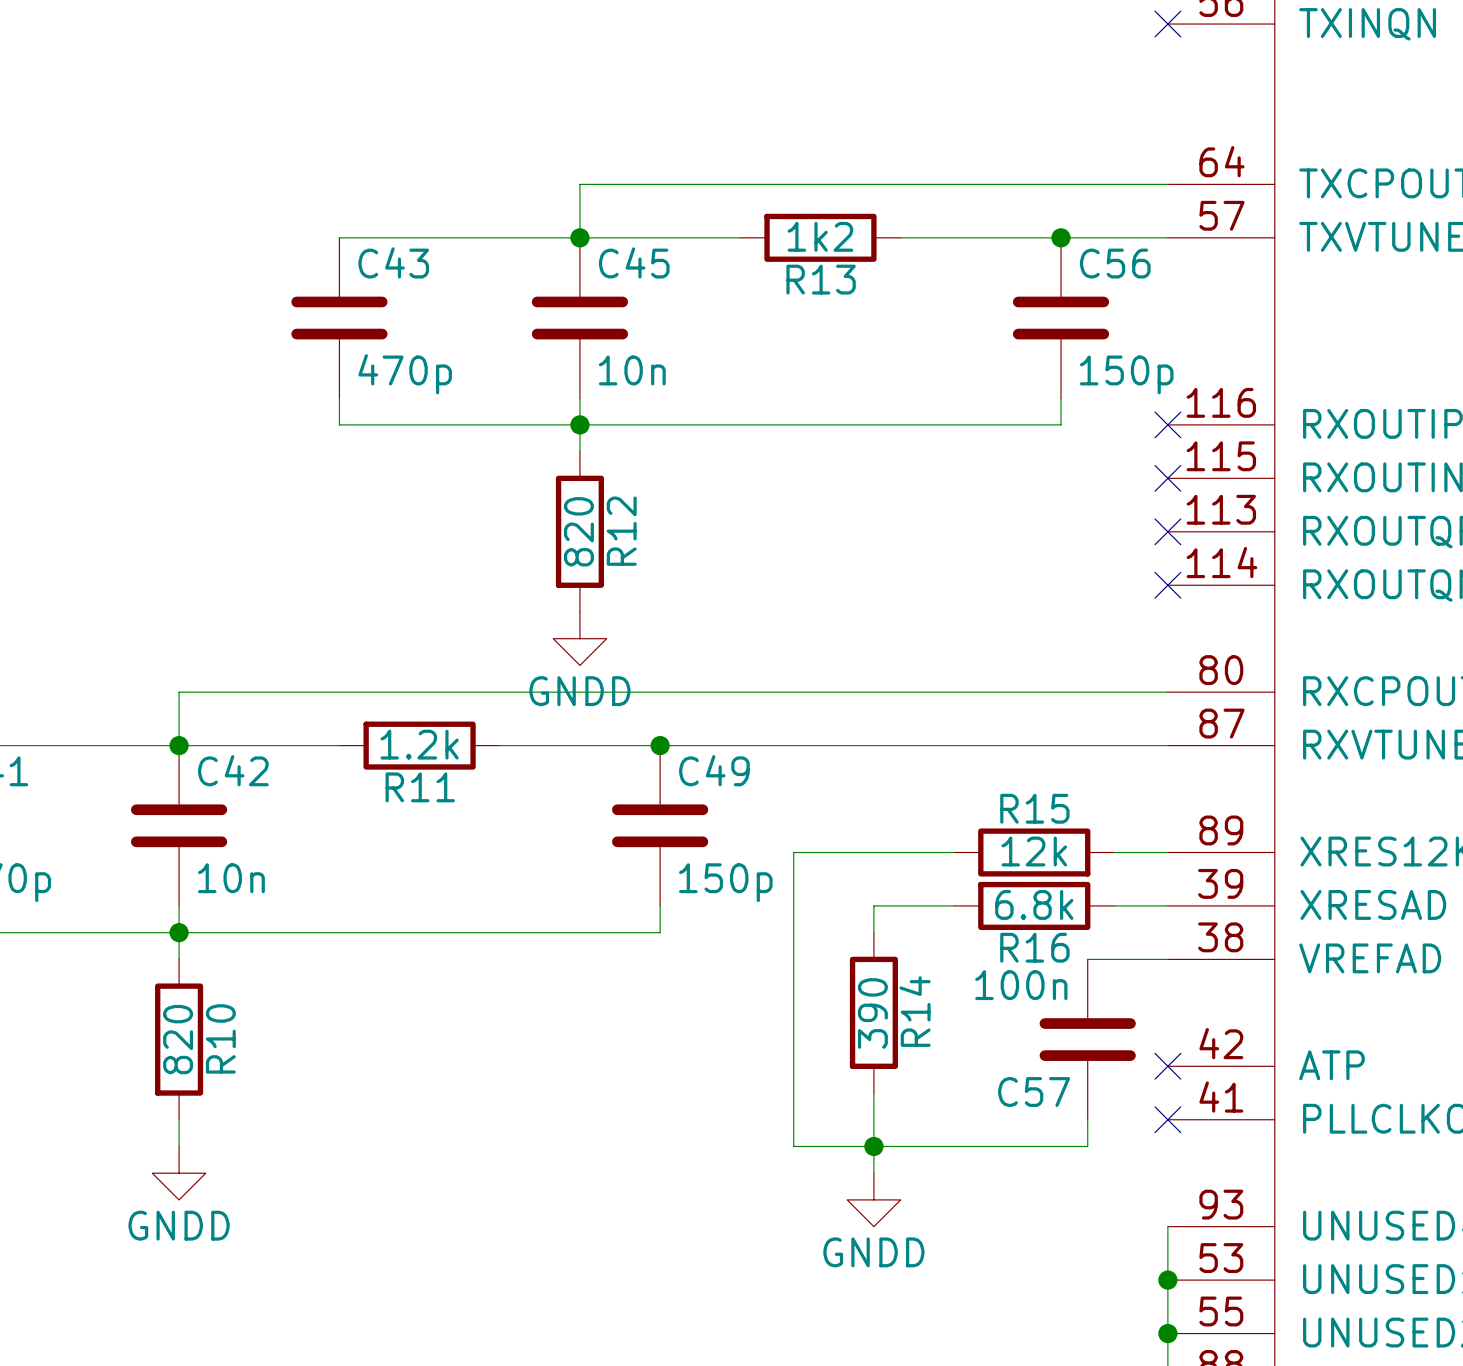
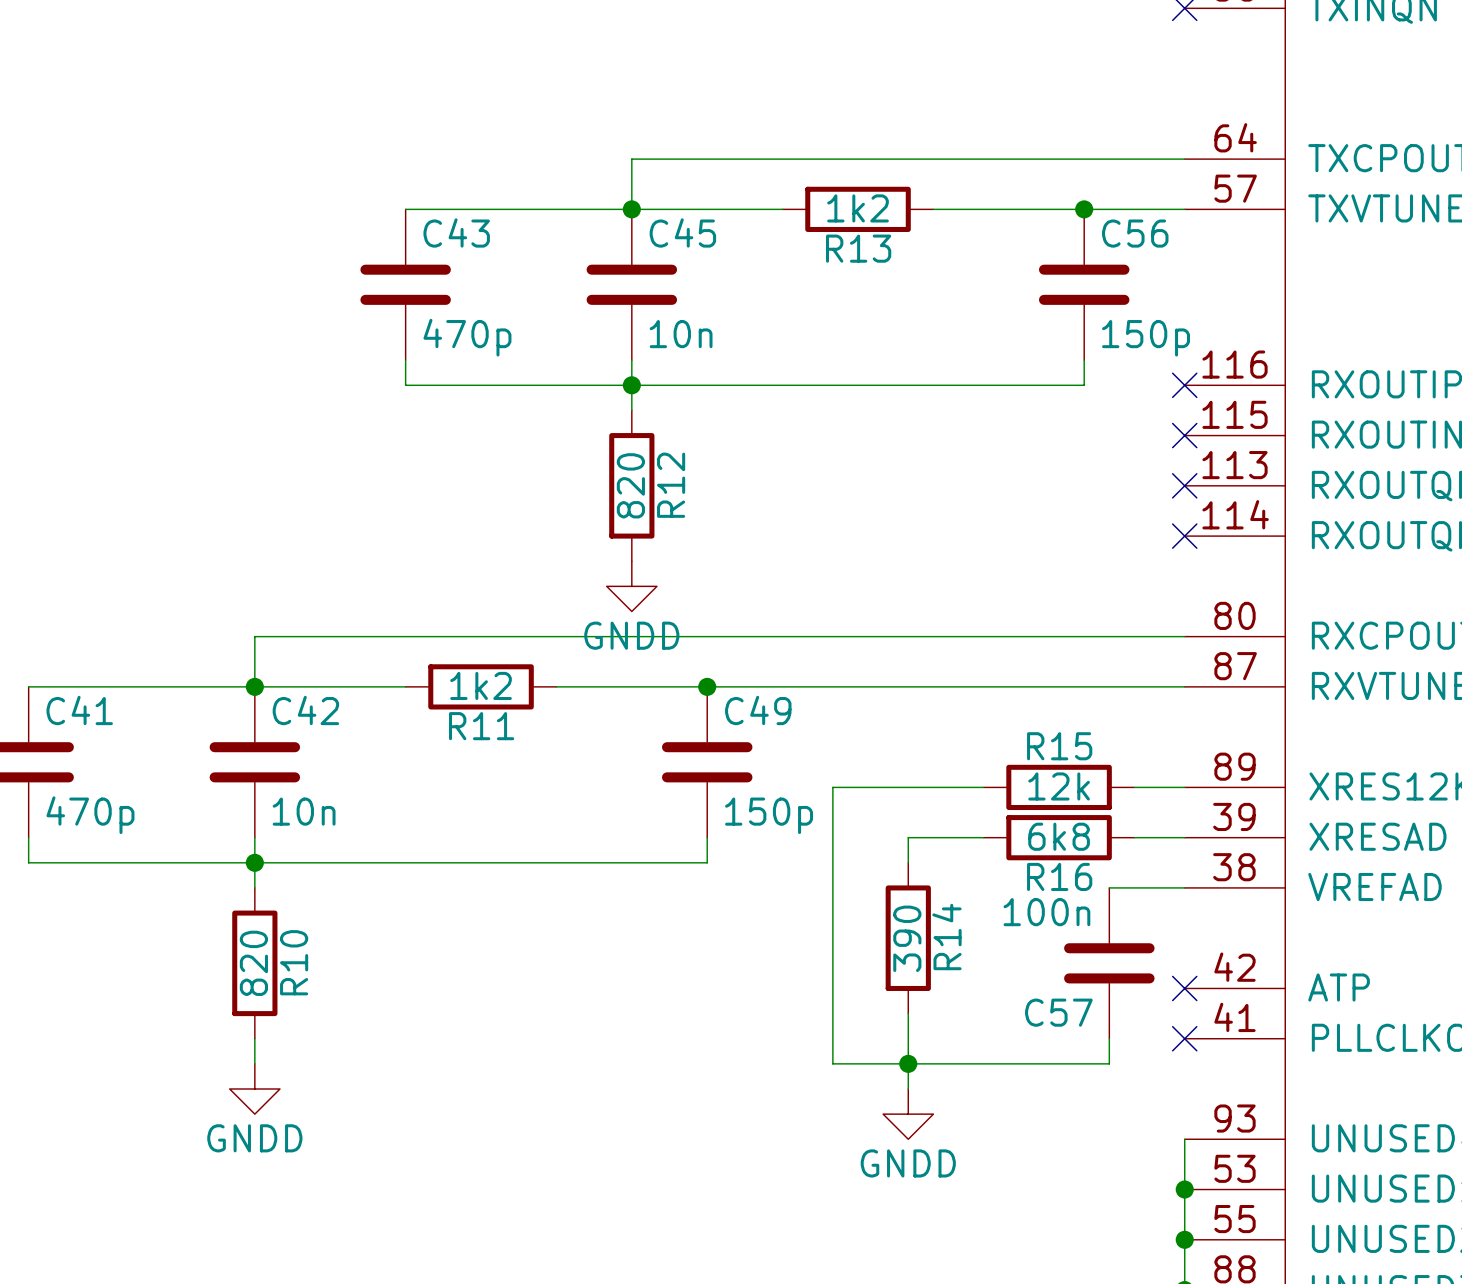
R11 value: 1.2k (419, 744) -> 1k2 (481, 685)
R16 value: 6.8k (1034, 904) -> 6k8 (1059, 836)

